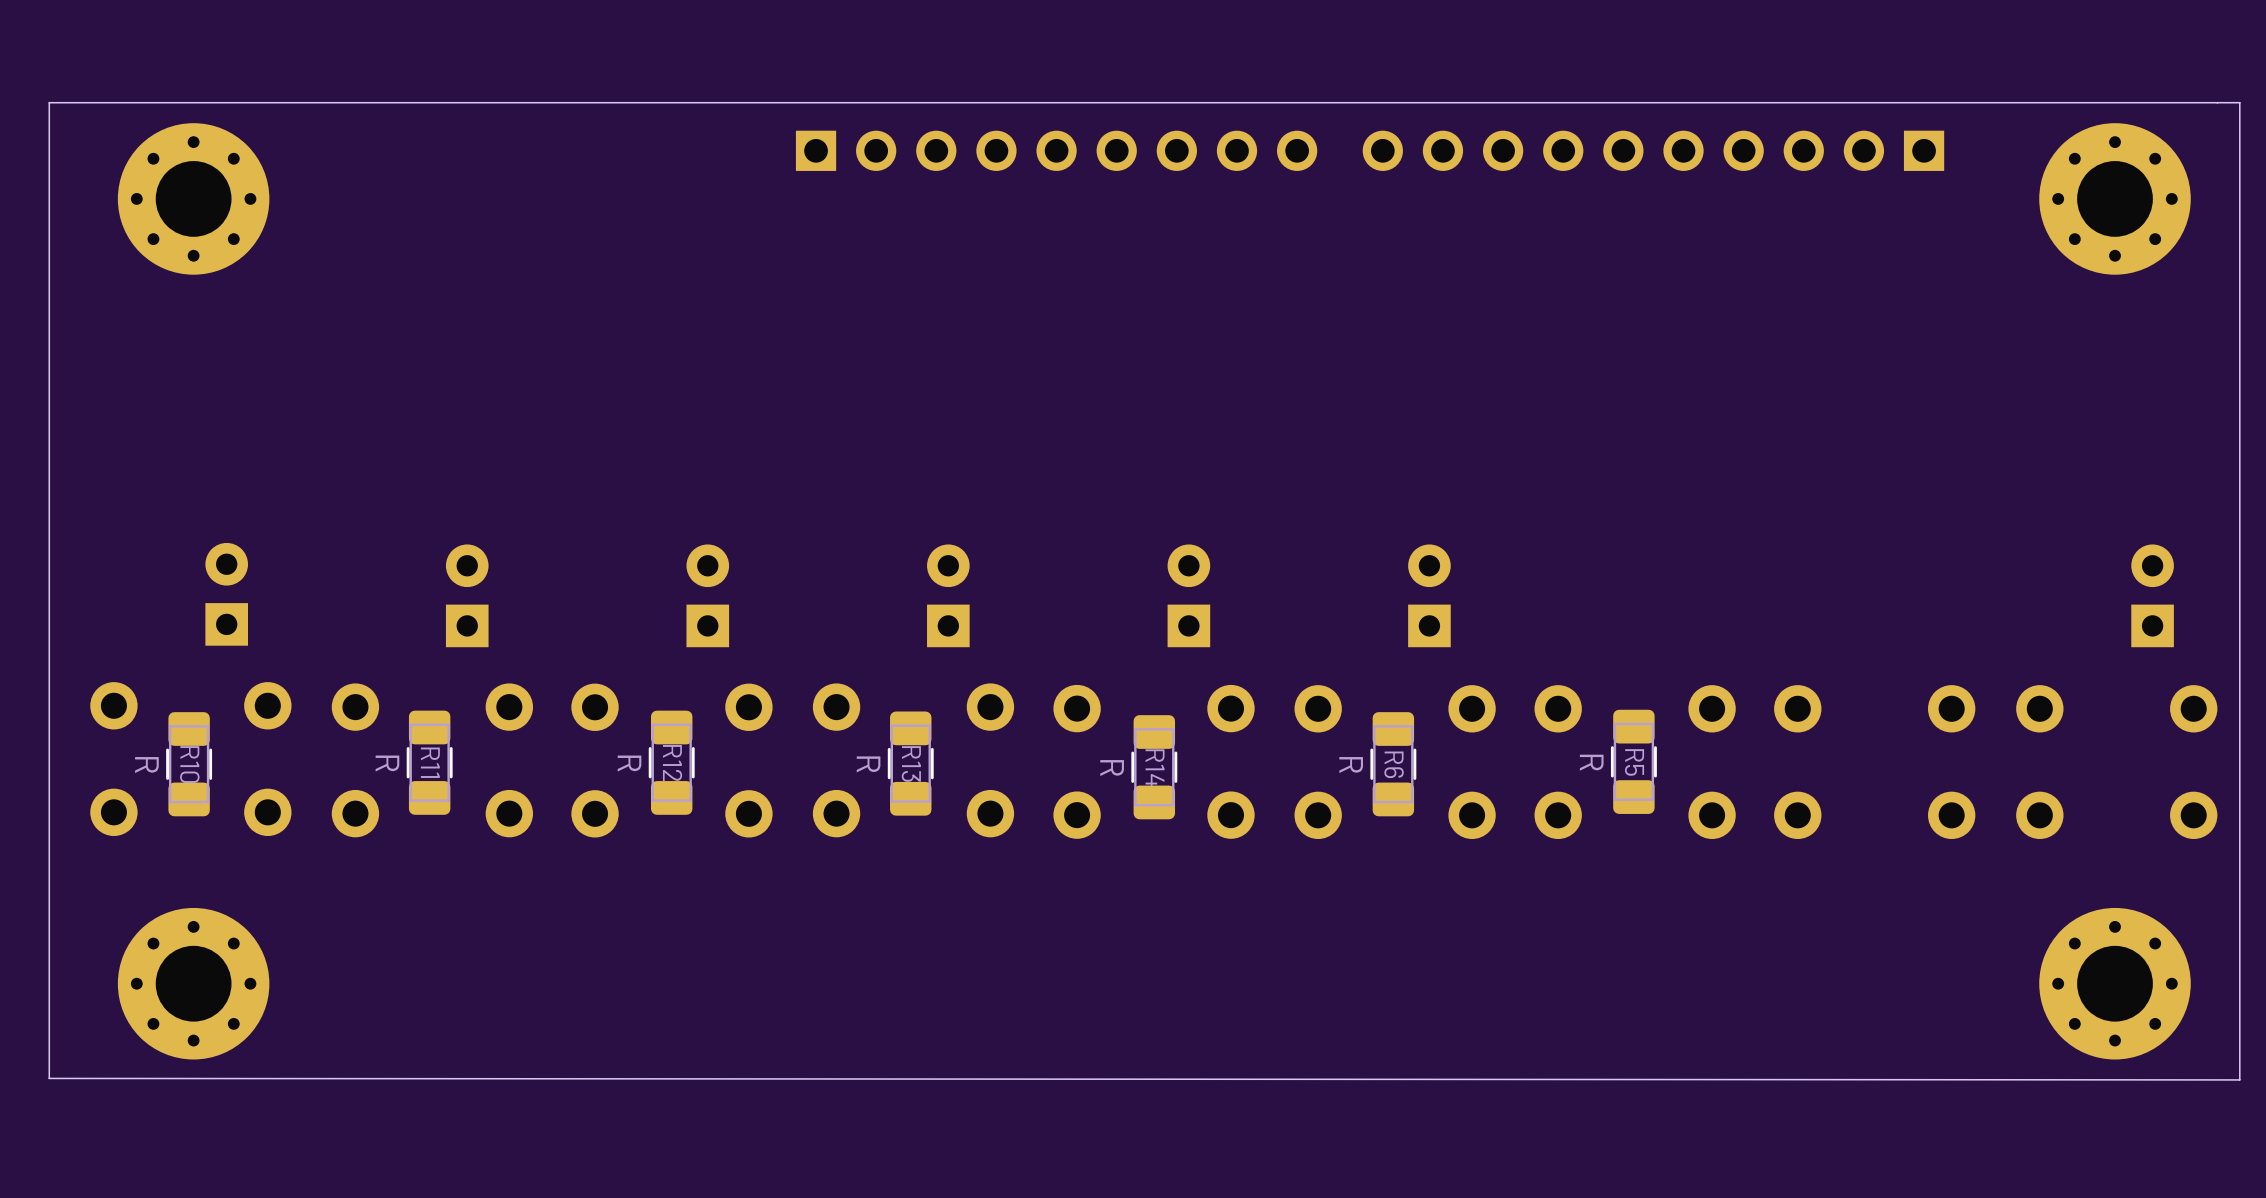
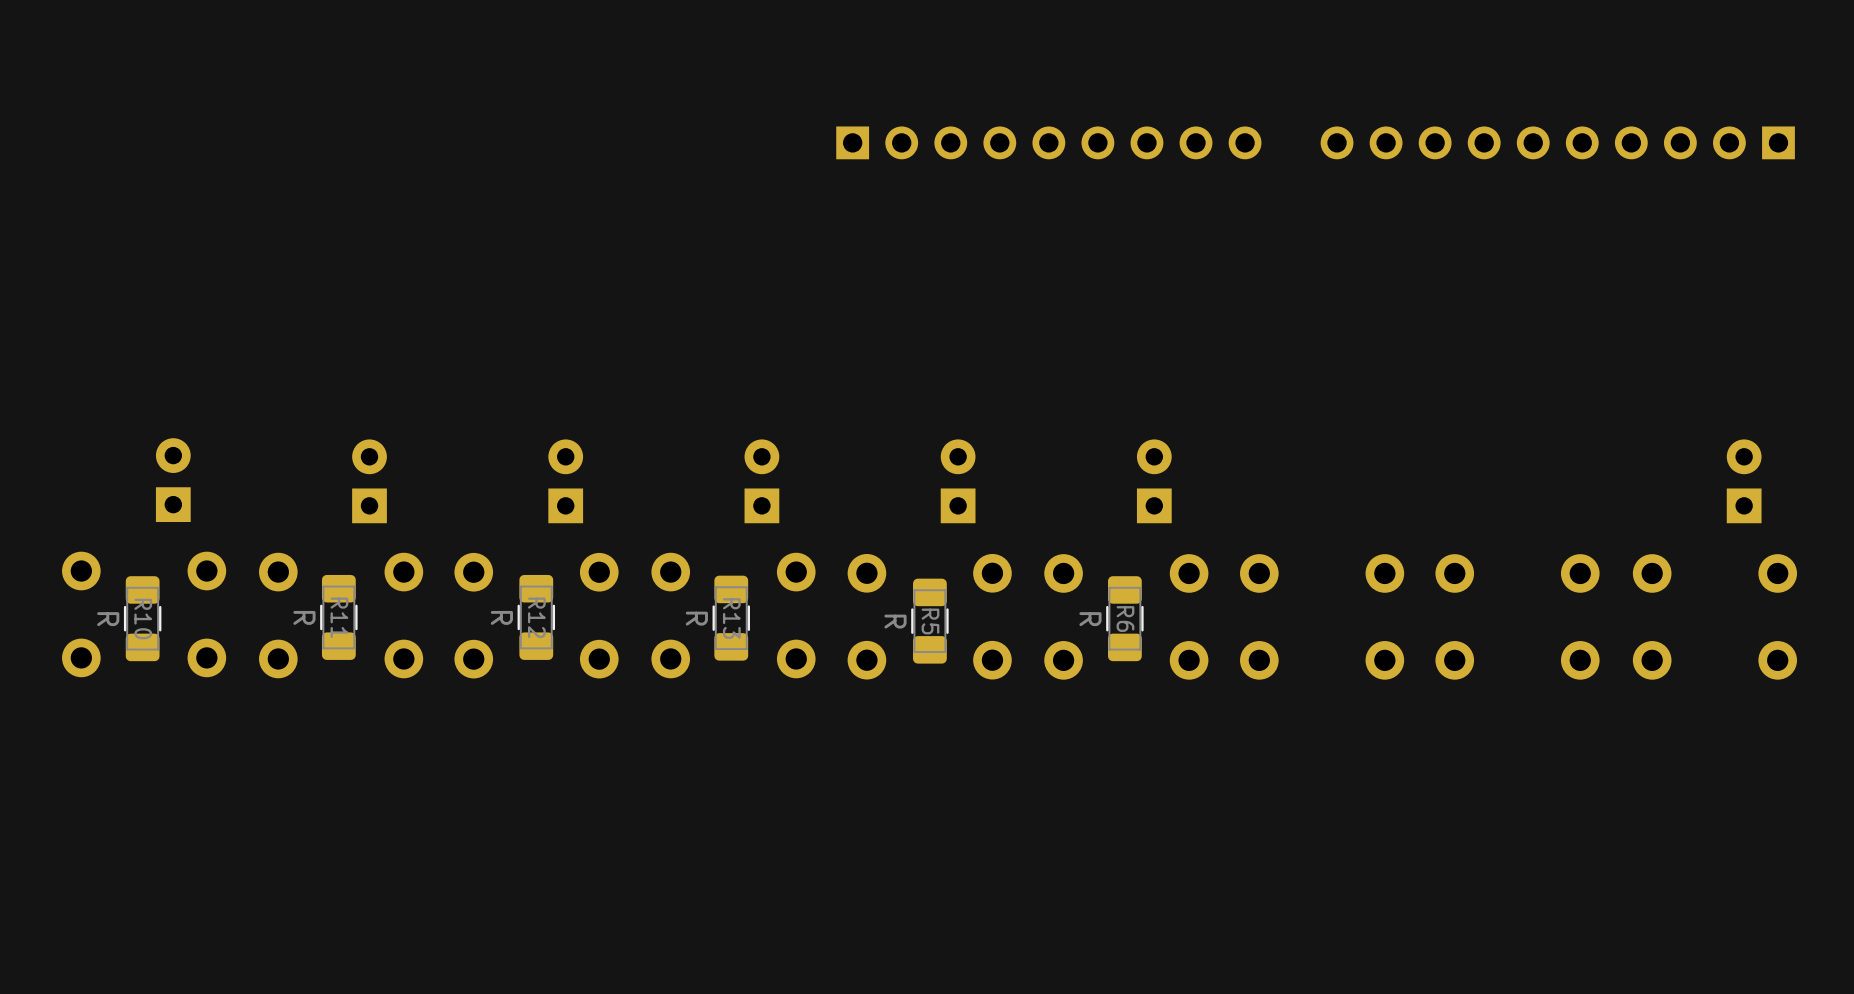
board edge: (2239, 102) (2239, 1079) (49, 1078) (49, 102) (2239, 102) -> none
part position: (1056, 150) -> (1048, 142)
part position: (1653, 150) -> (1557, 142)
part: (193, 198) -> none
part: (2115, 198) -> none
R5: R (1633, 761) -> none
R14 name: R14 (1155, 767) -> R5 (930, 621)
part: (193, 983) -> none
part: (2115, 983) -> none

